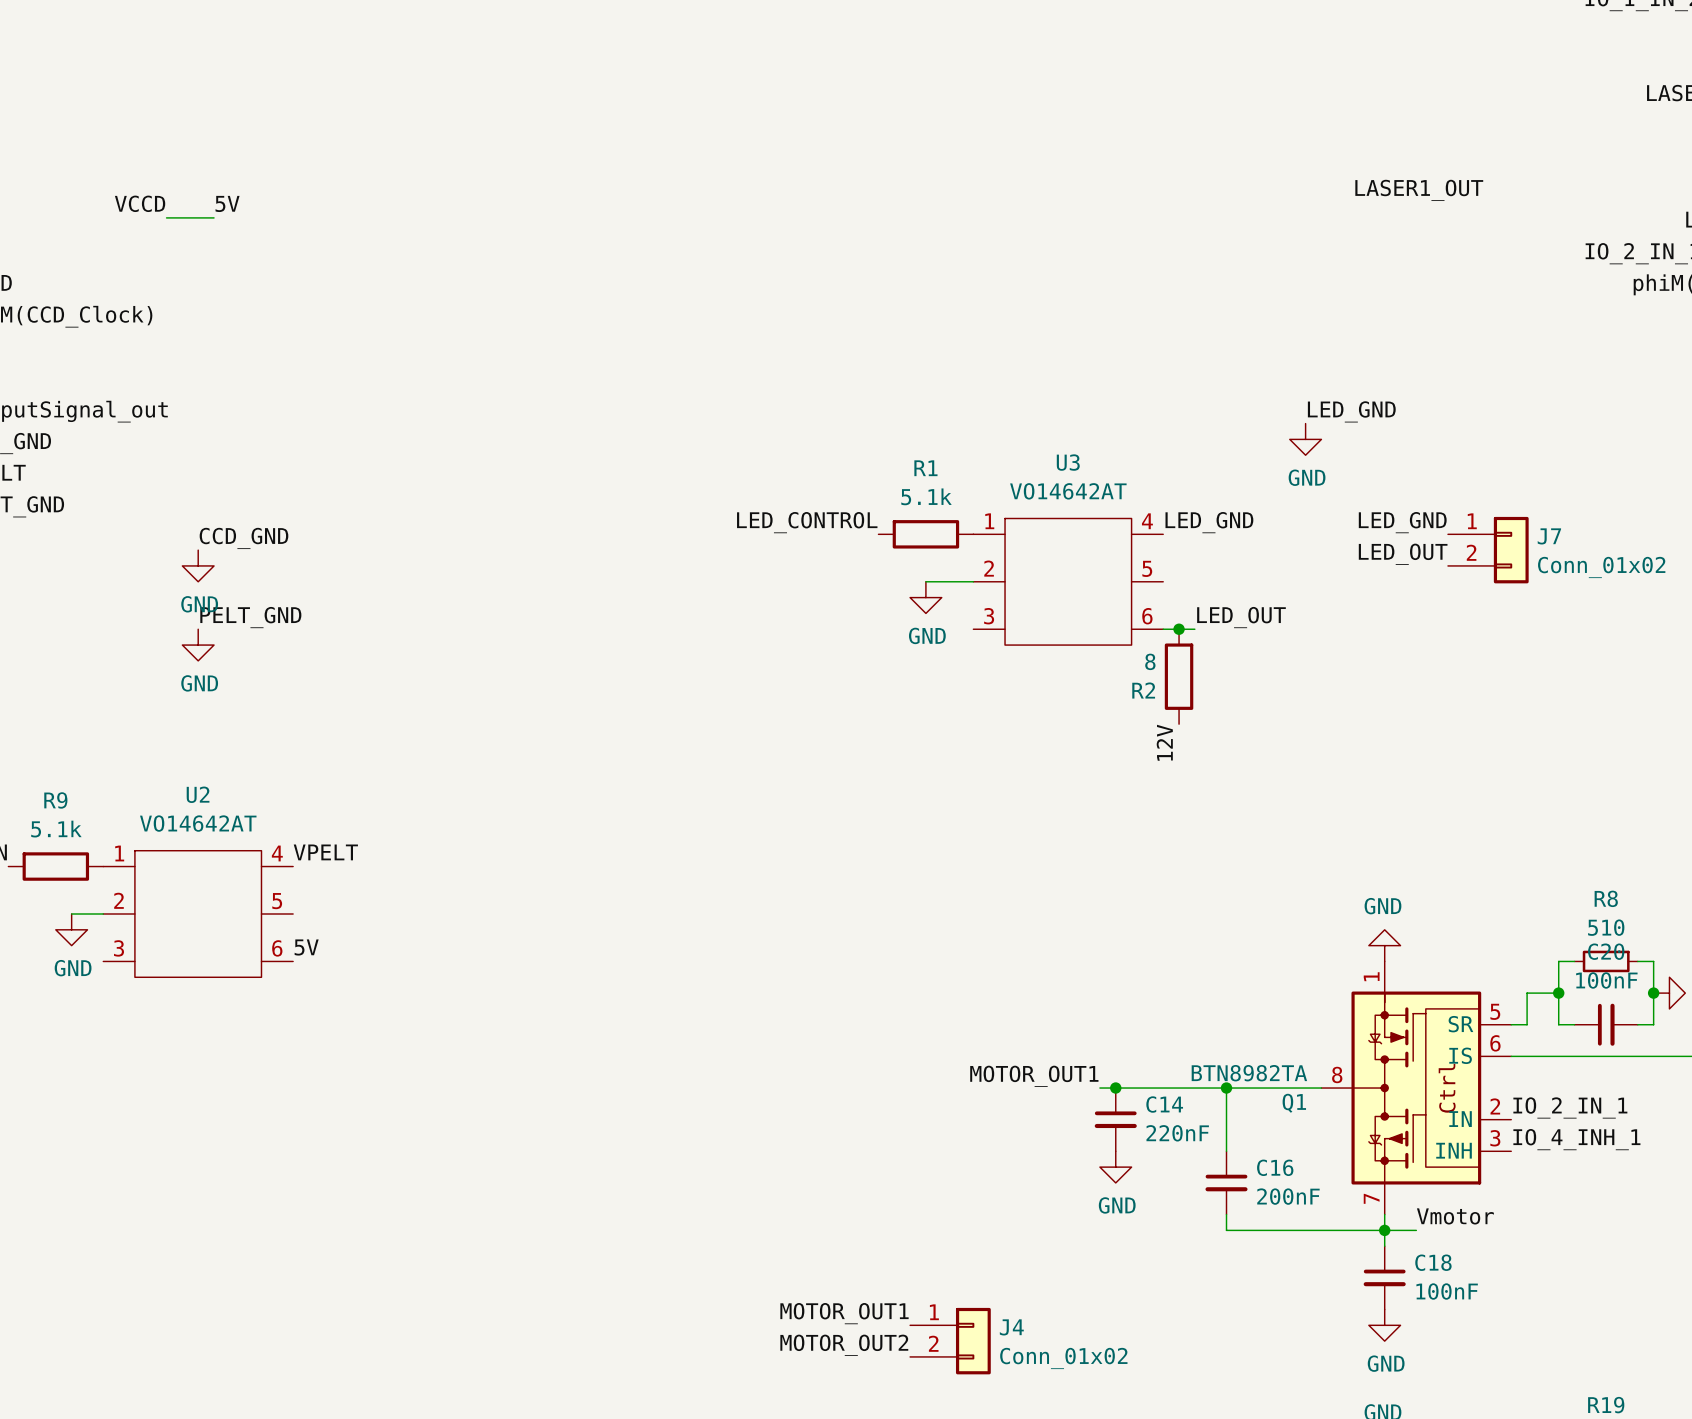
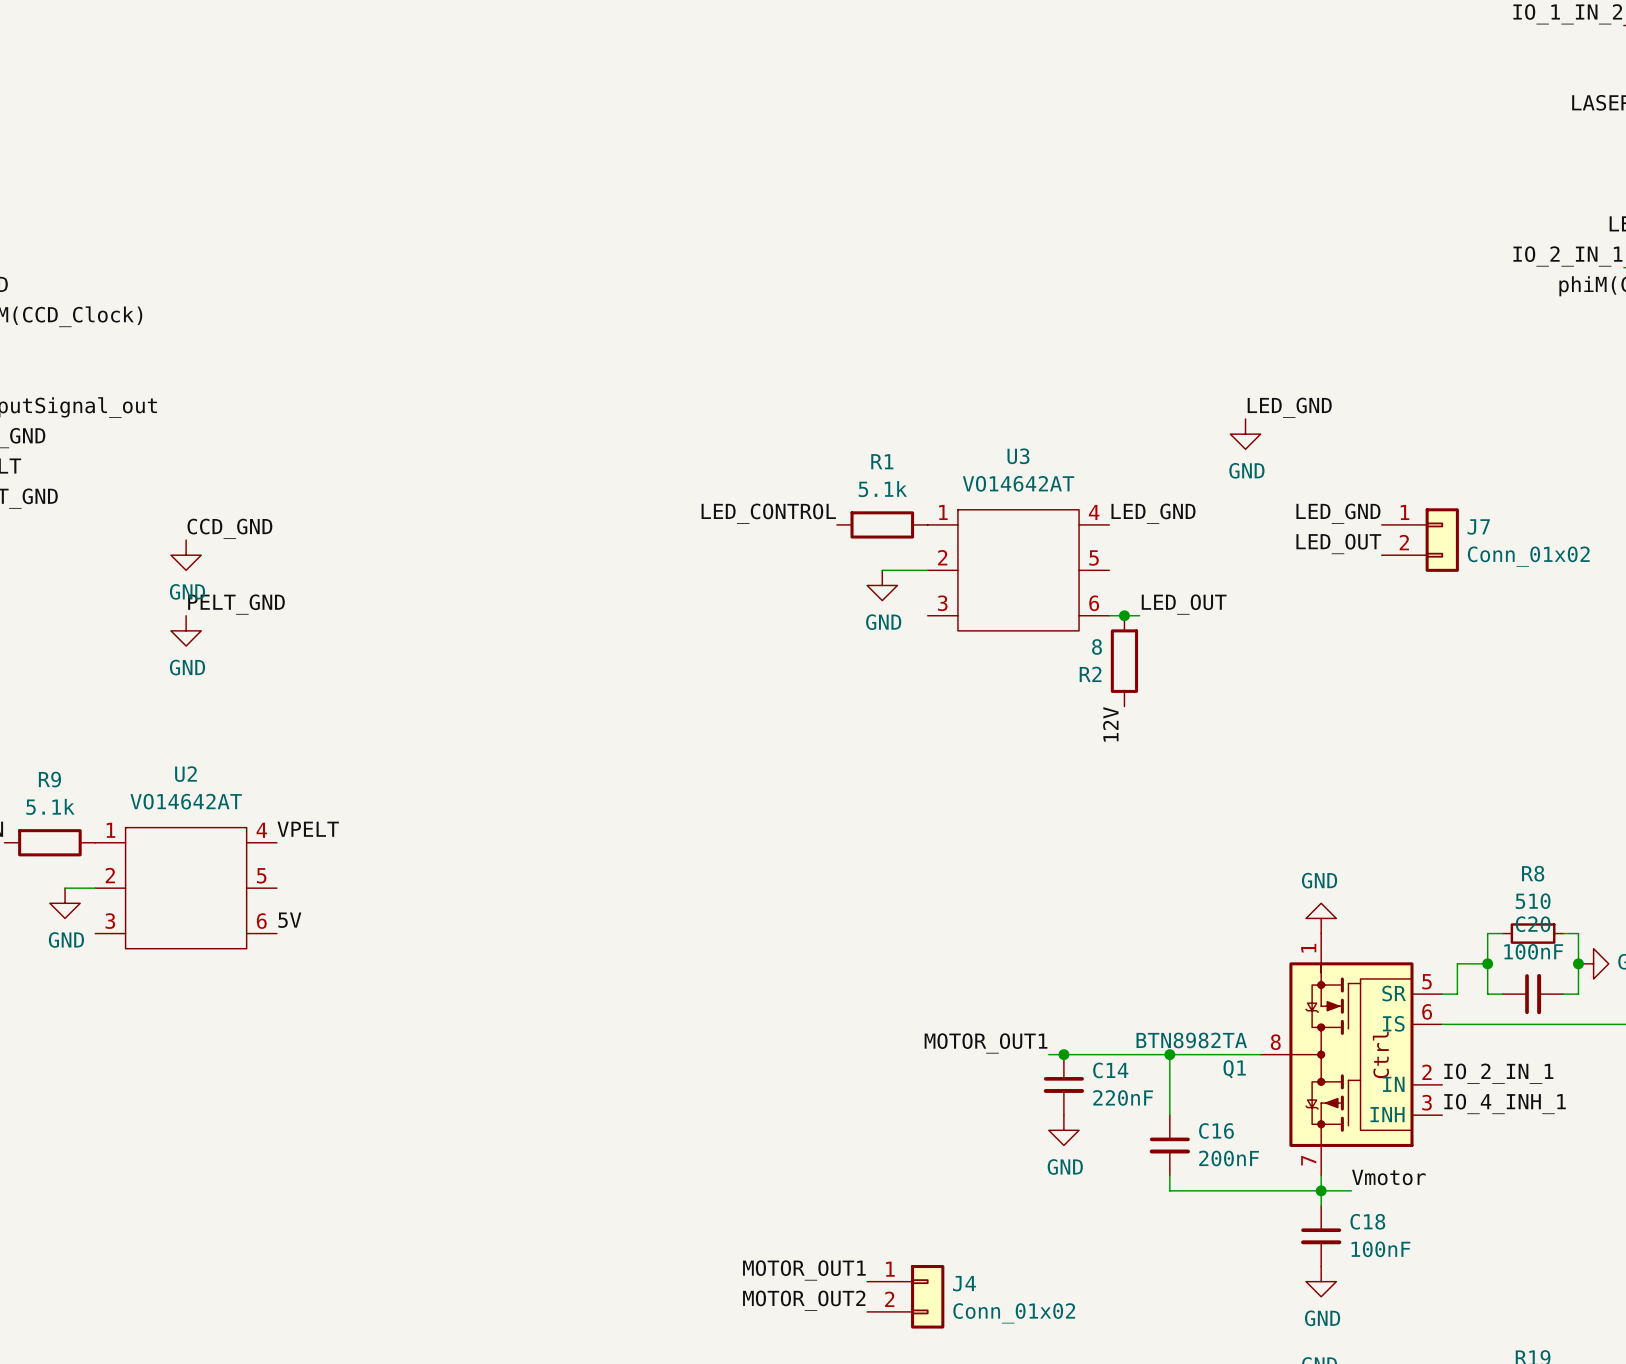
label: LASER1_OUT (1419, 190) -> none
label: VCCD (140, 203) -> none
label: 5V (227, 203) -> none
wire: (166, 217) (214, 217) -> none

